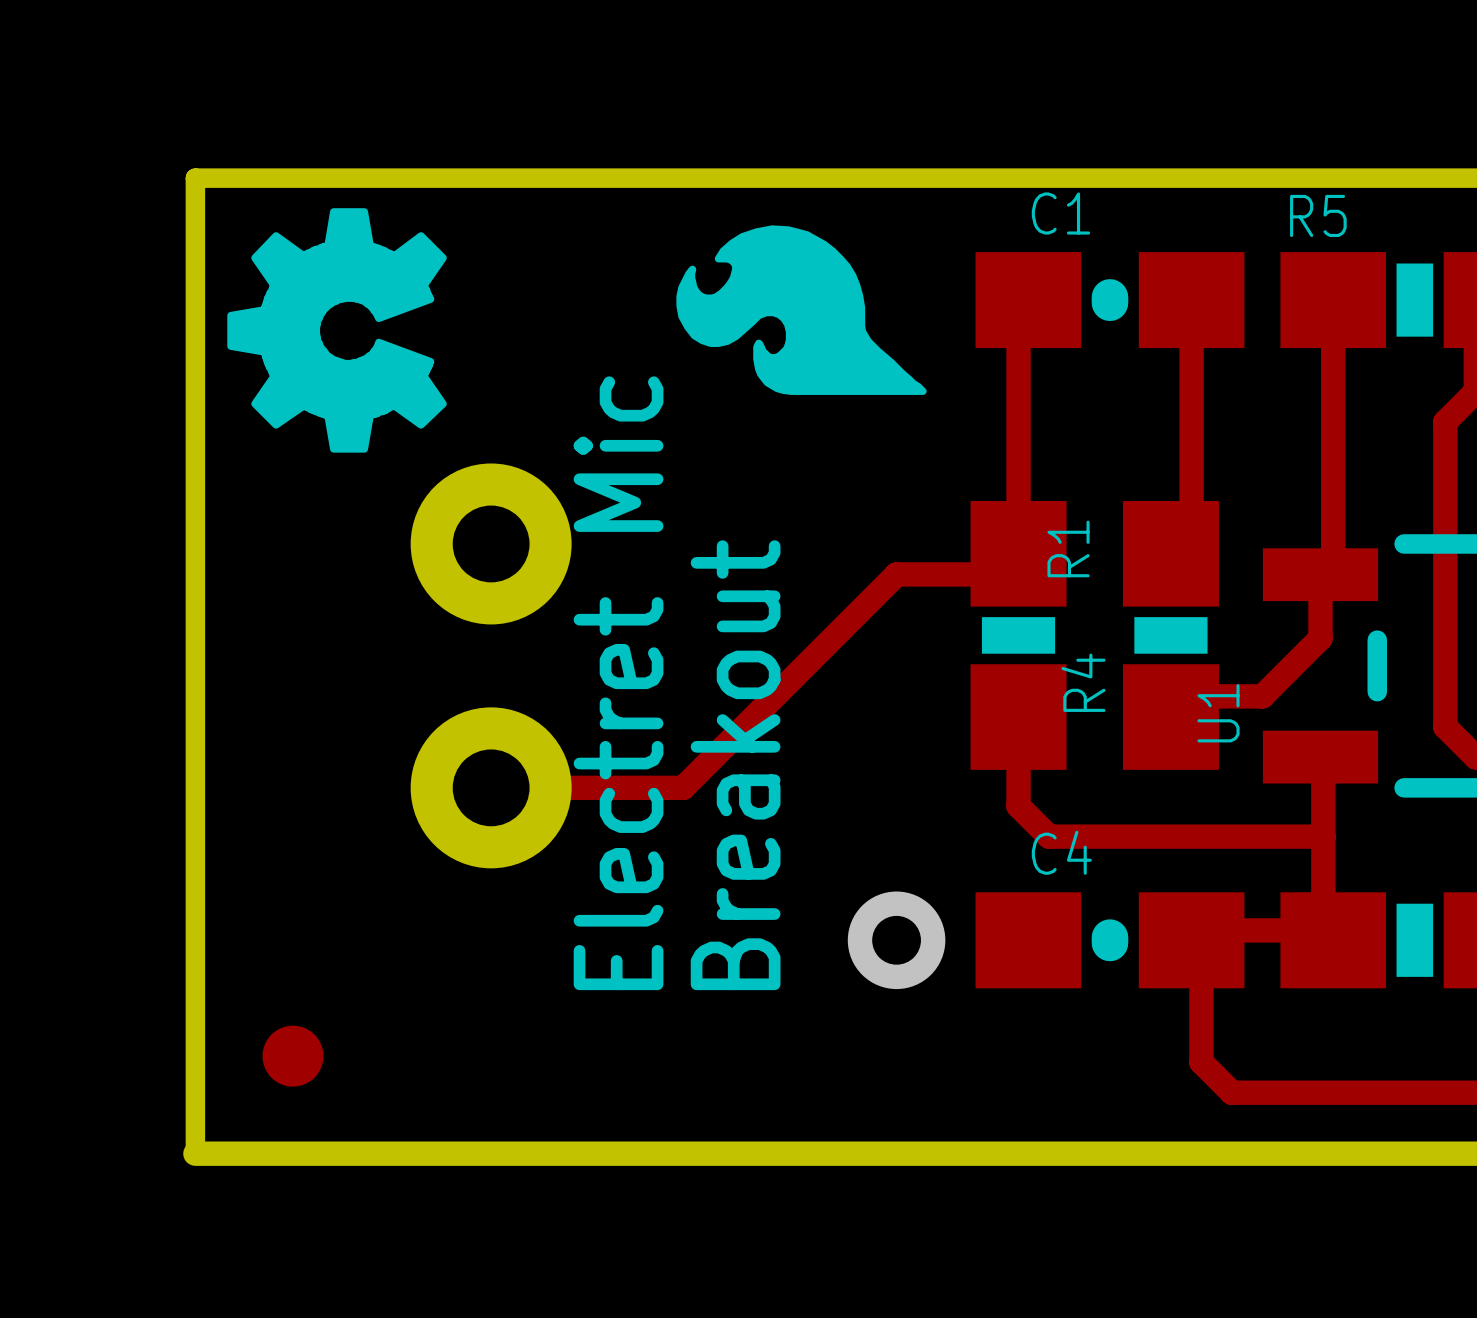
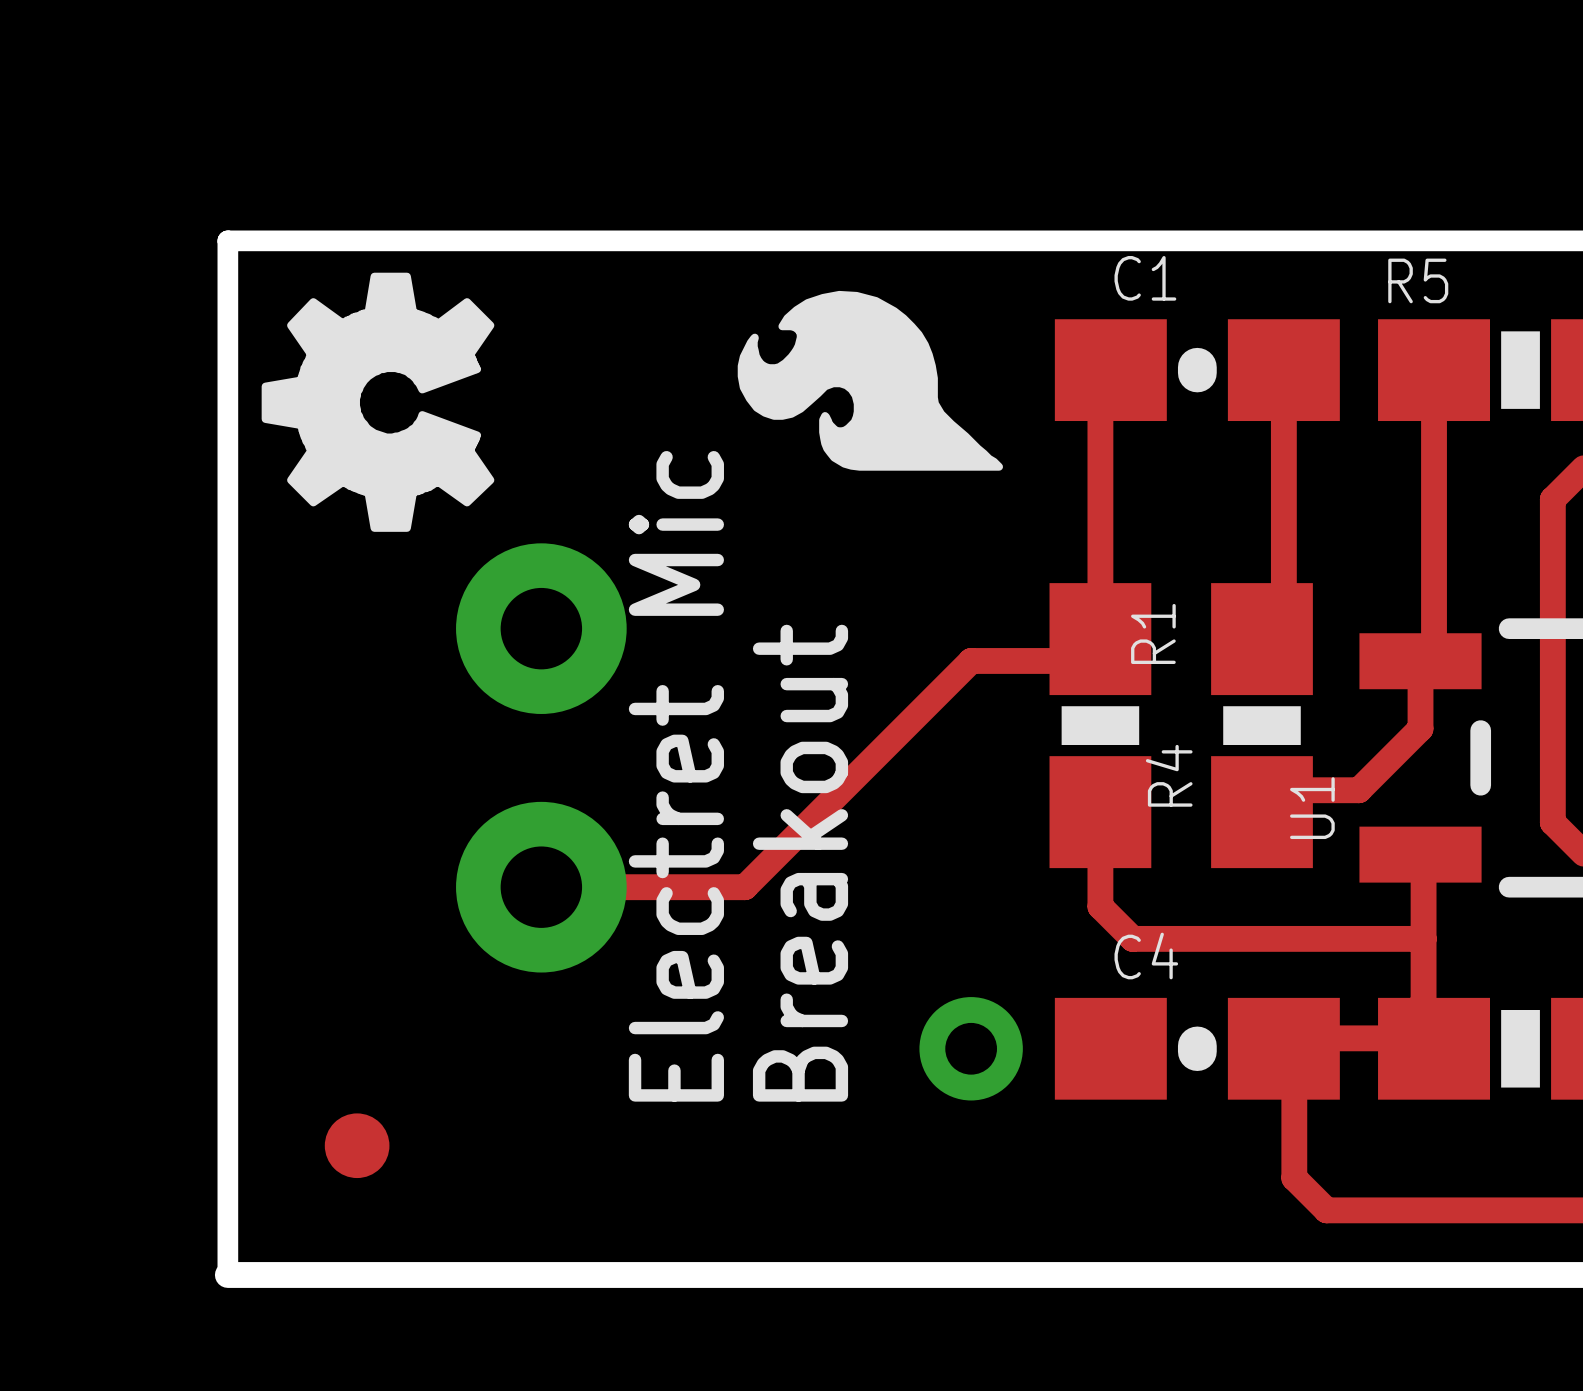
part position: (292, 1056) -> (357, 1145)

